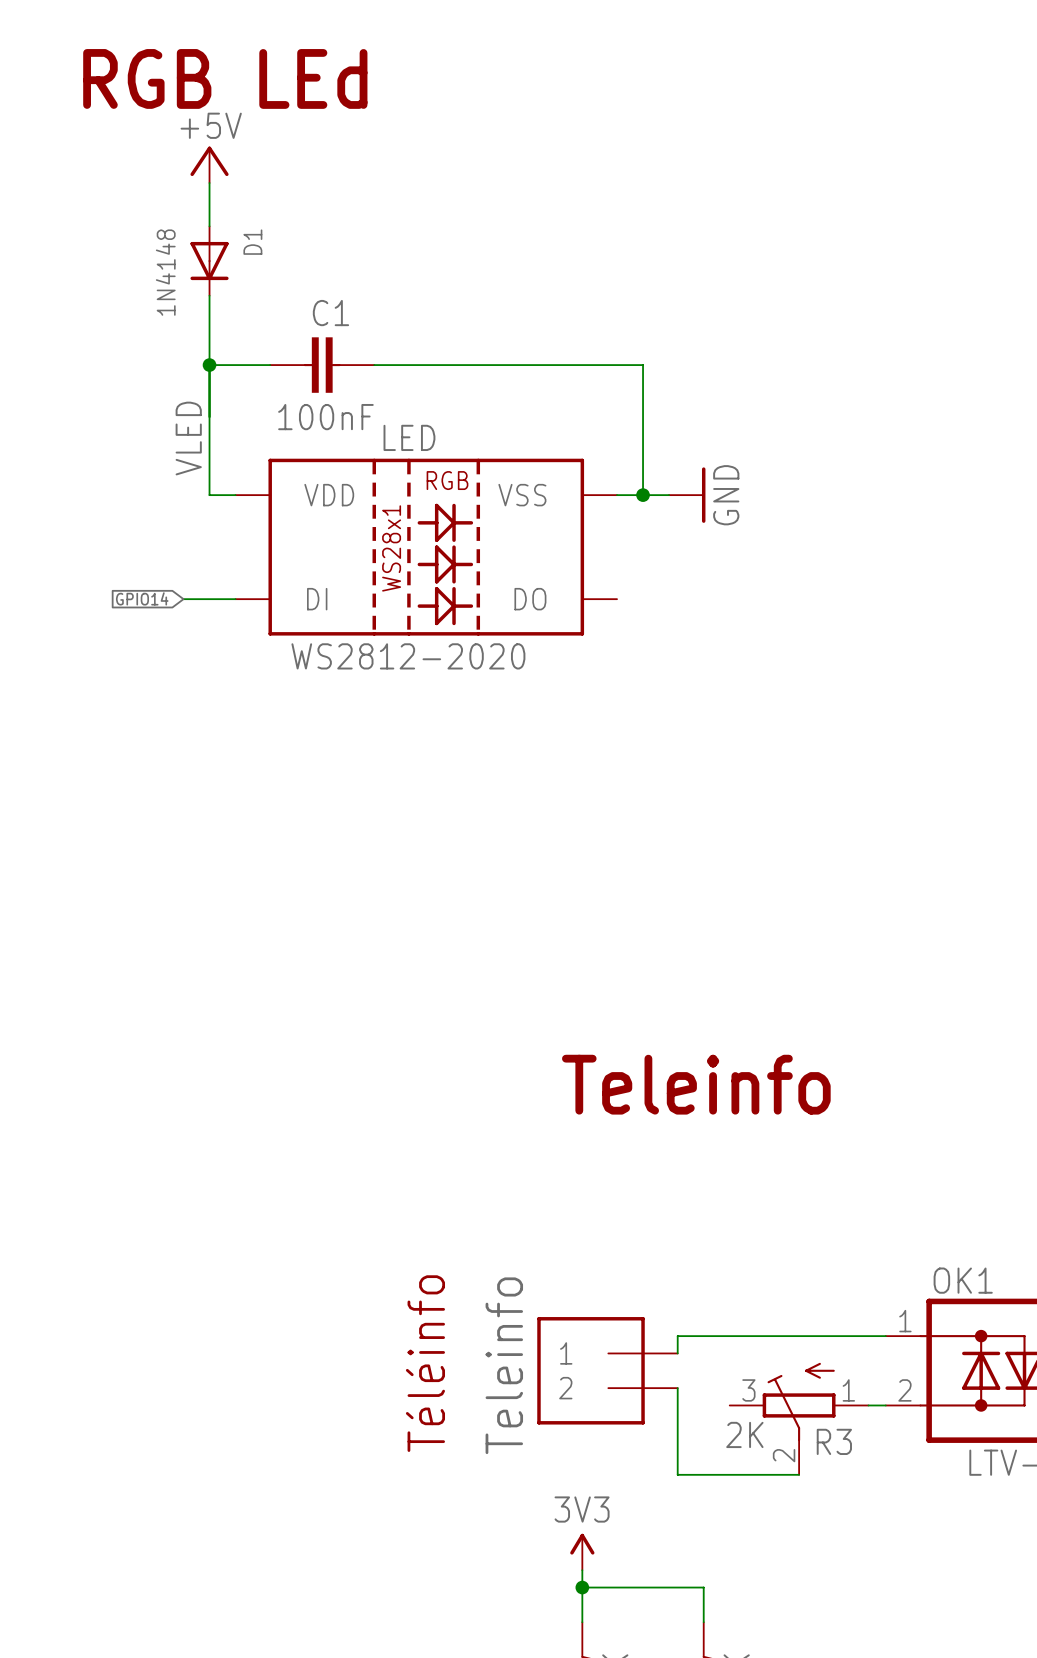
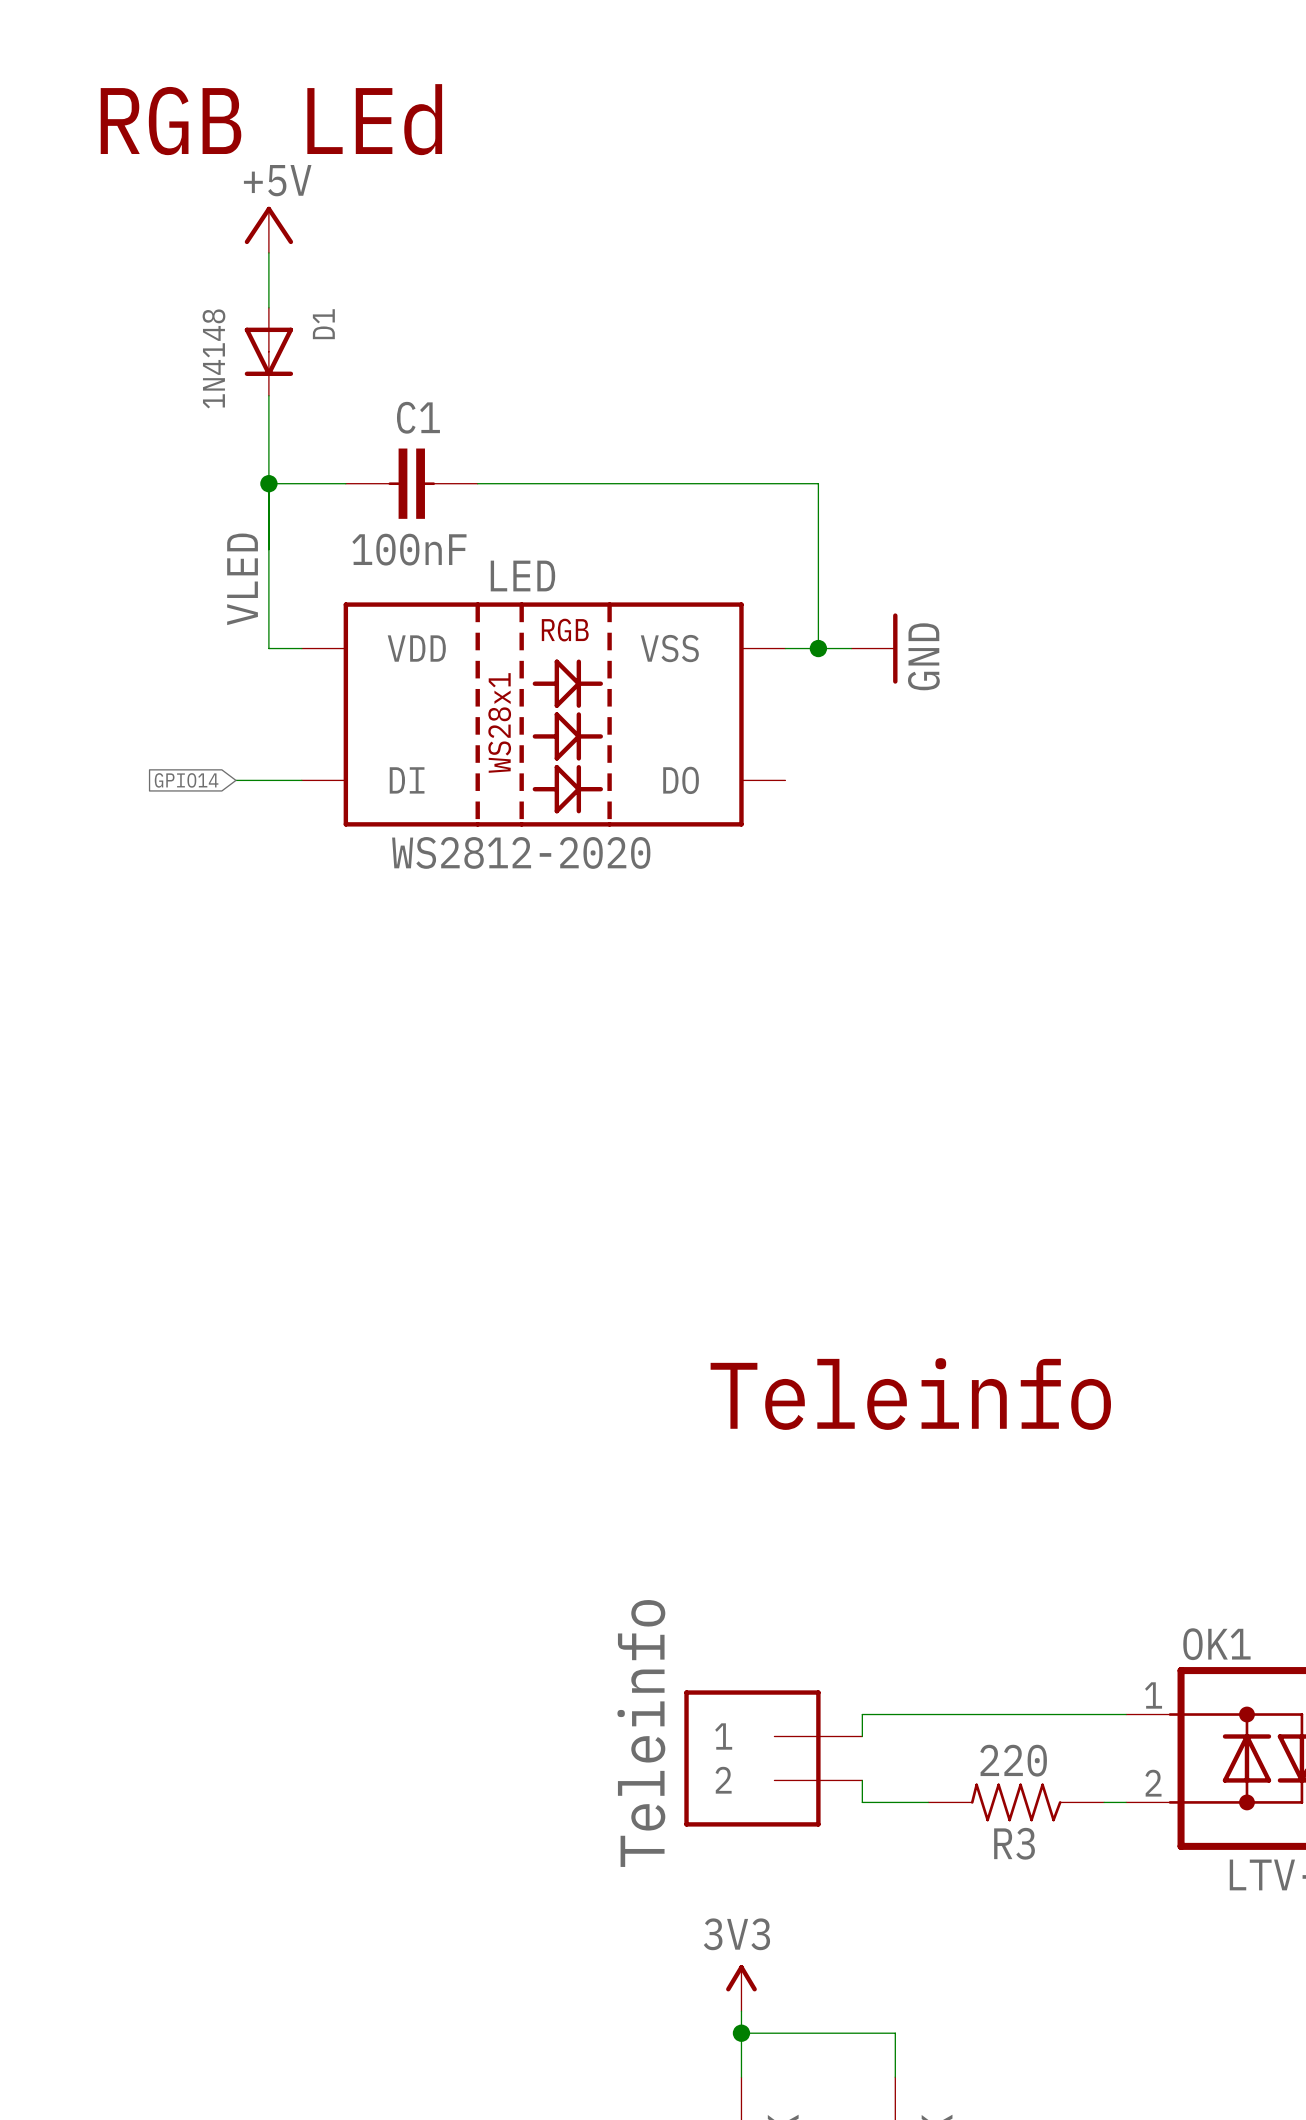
R3 symbol: [729, 1362, 869, 1475] -> [928, 1783, 1105, 1822]
text: Téléinfo (425, 1363) -> none
wire: (677, 1405) (677, 1474) (799, 1474) -> (862, 1802) (928, 1802)
R3 value: 2K (744, 1434) -> 220 (1013, 1760)
R3 name position: R3 (834, 1441) -> R3 (1014, 1843)

